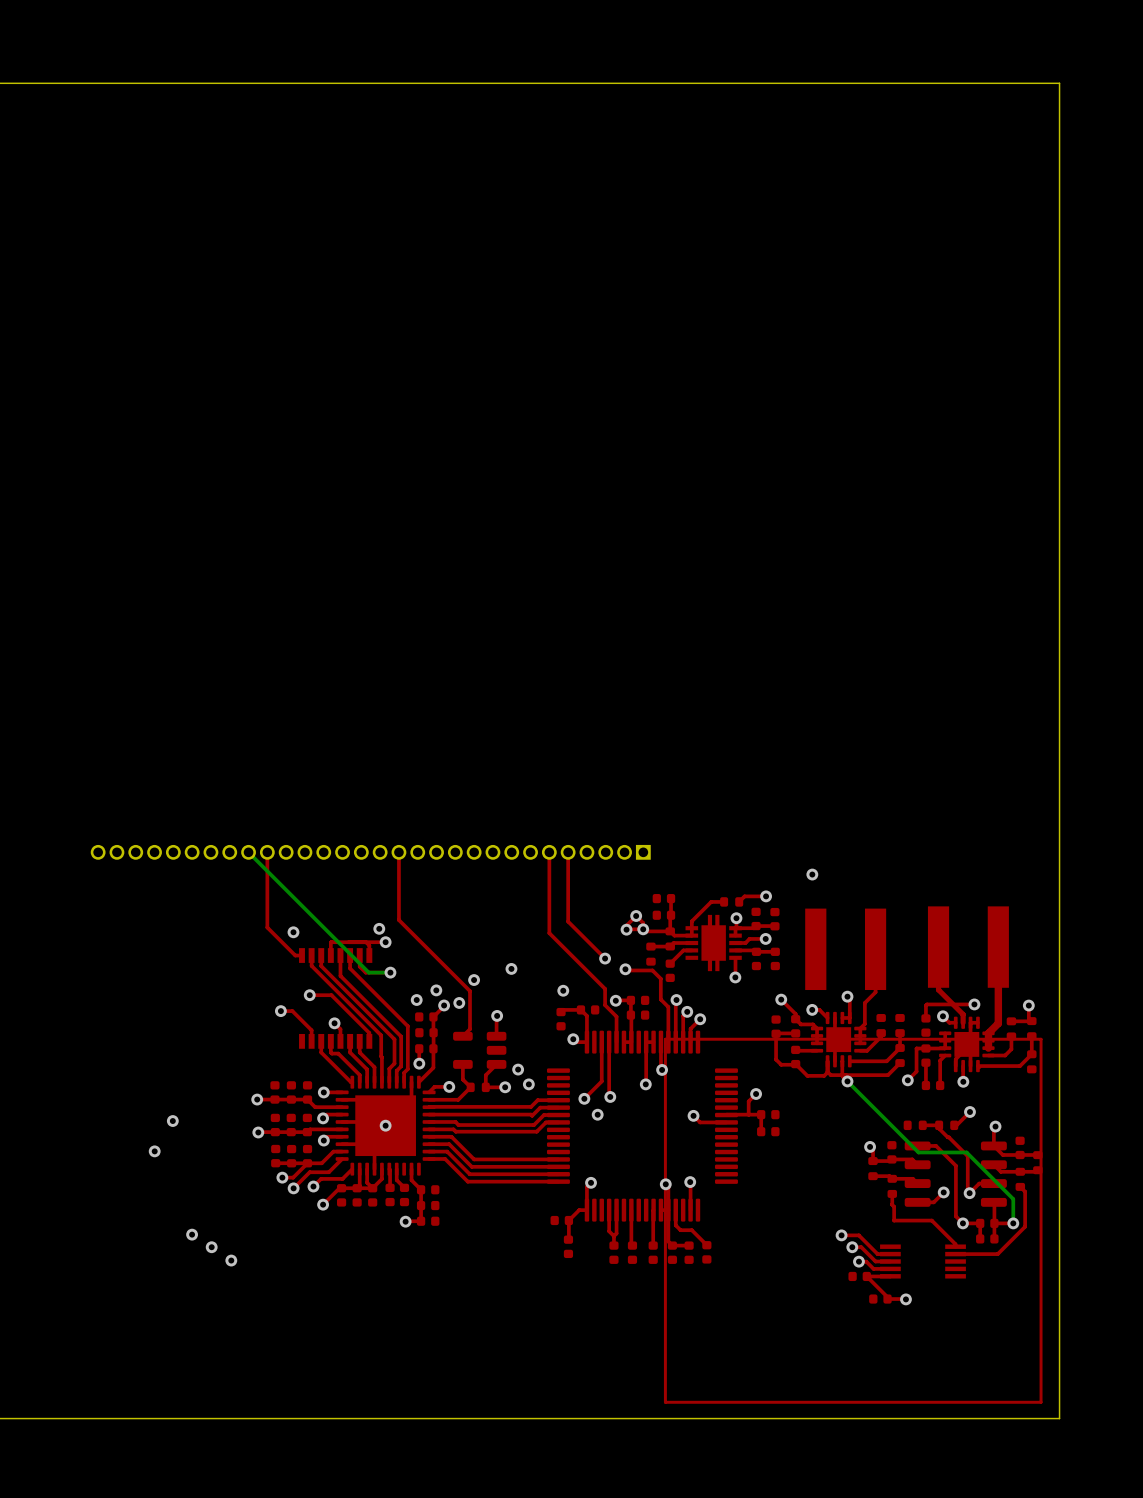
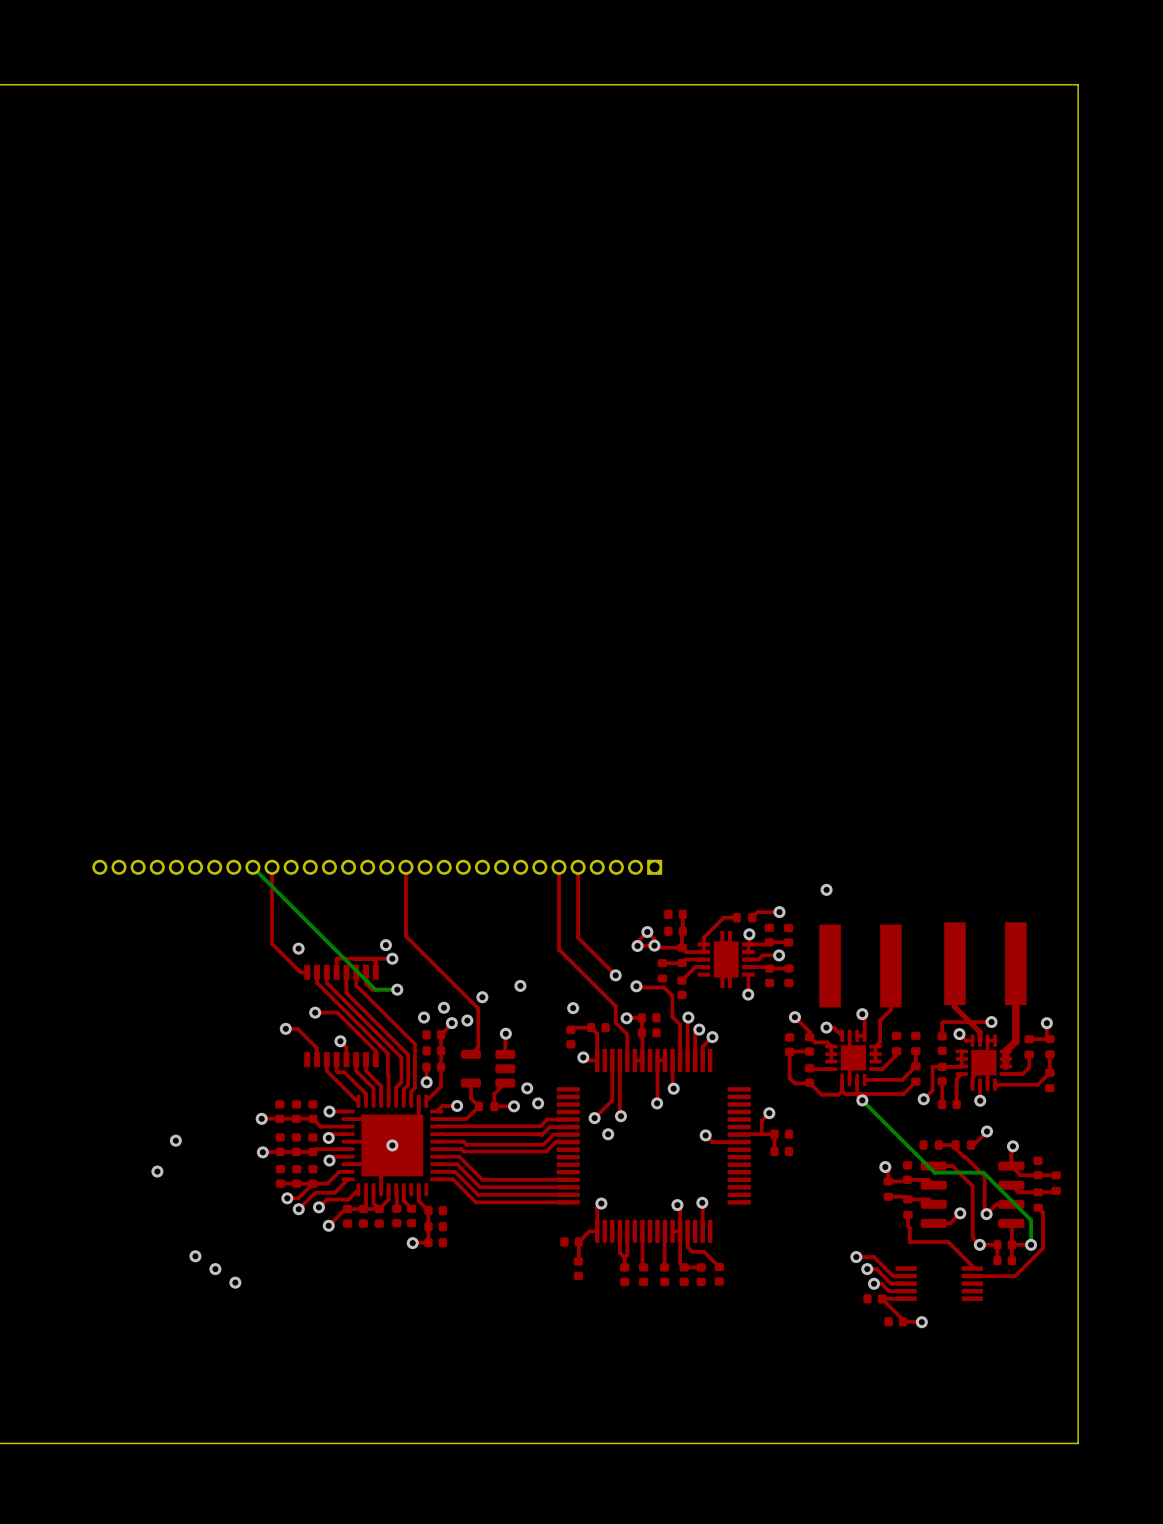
top track: (1041, 1039) (665, 1039) (665, 1402) (1041, 1402) (1041, 1039) -> none

